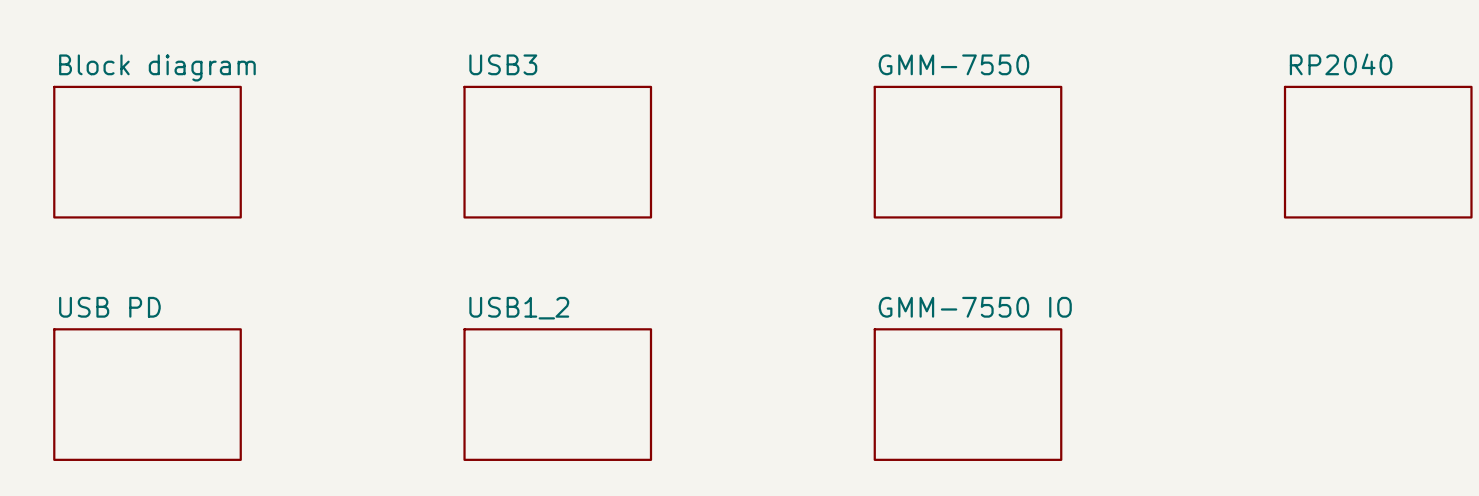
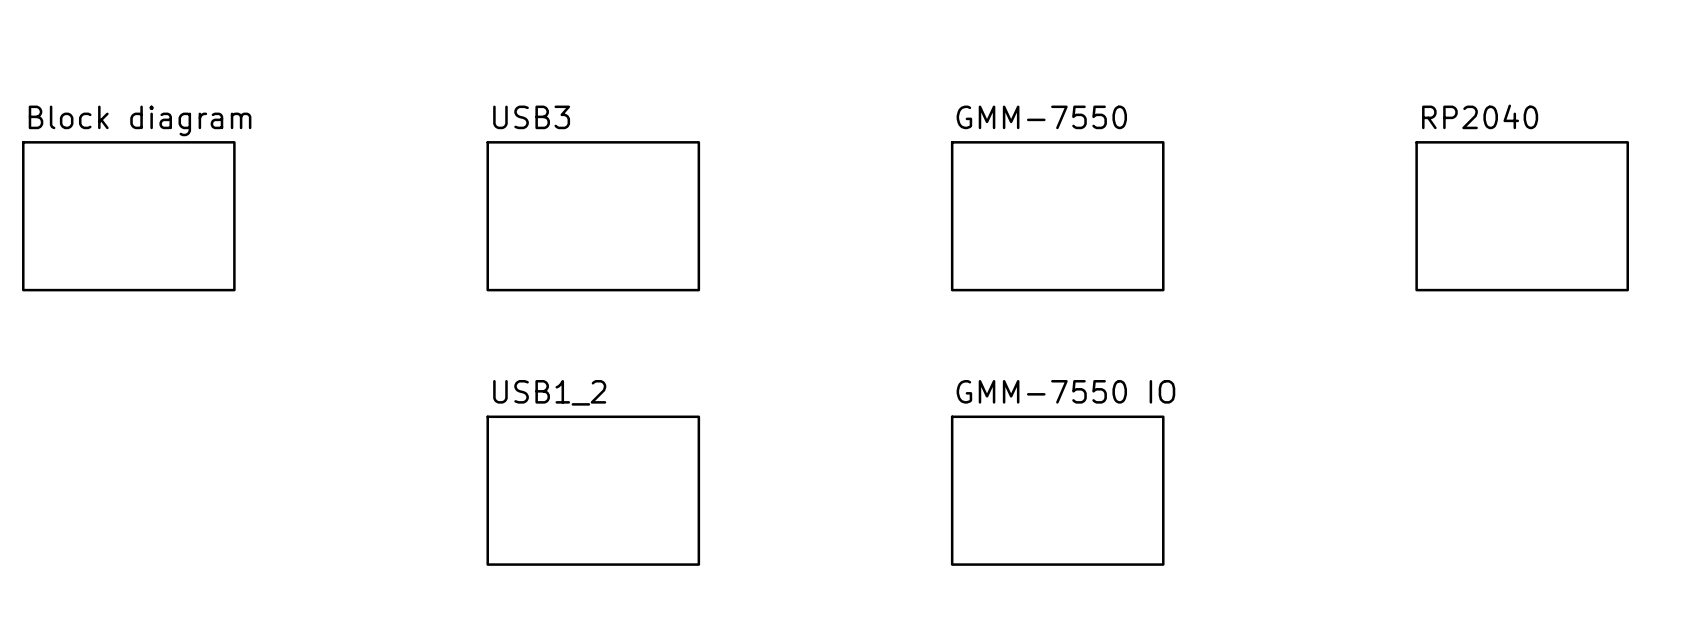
sheet USB PD: (147, 394) -> none

